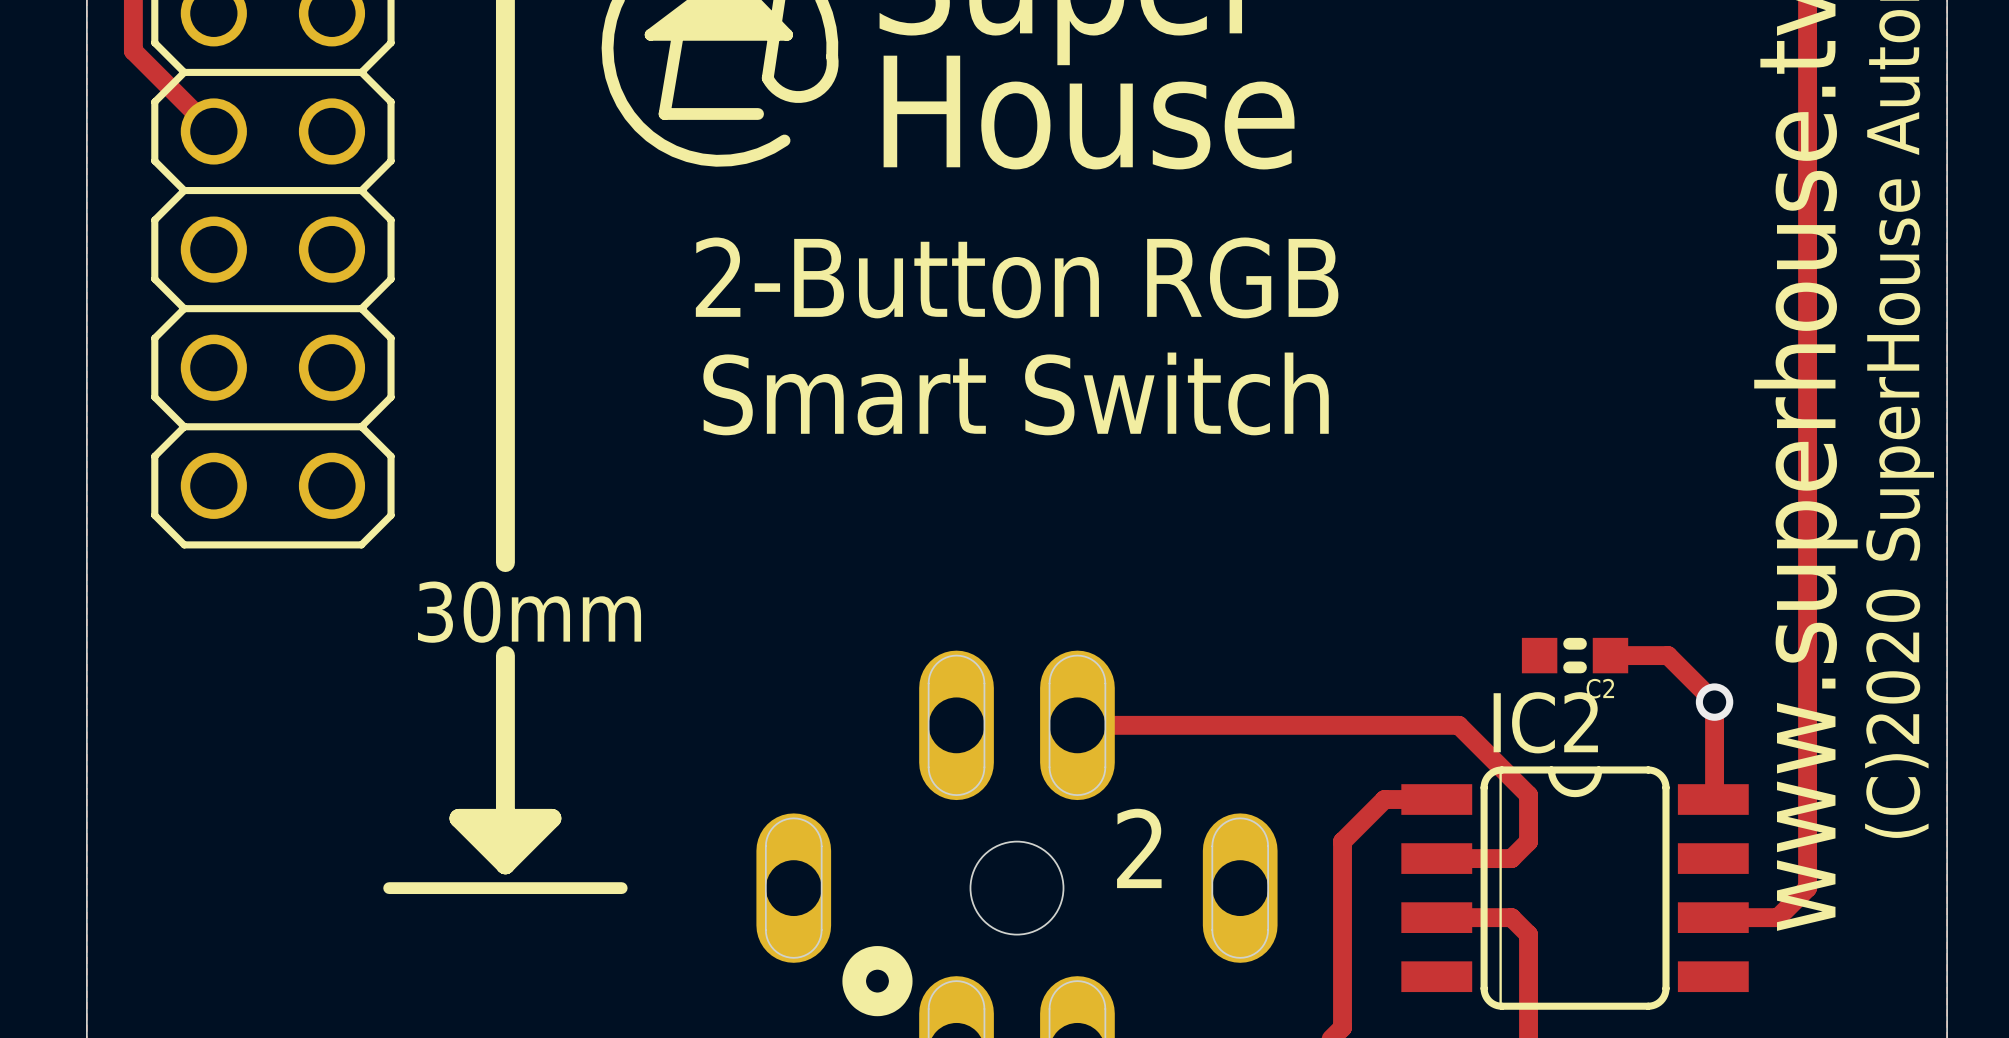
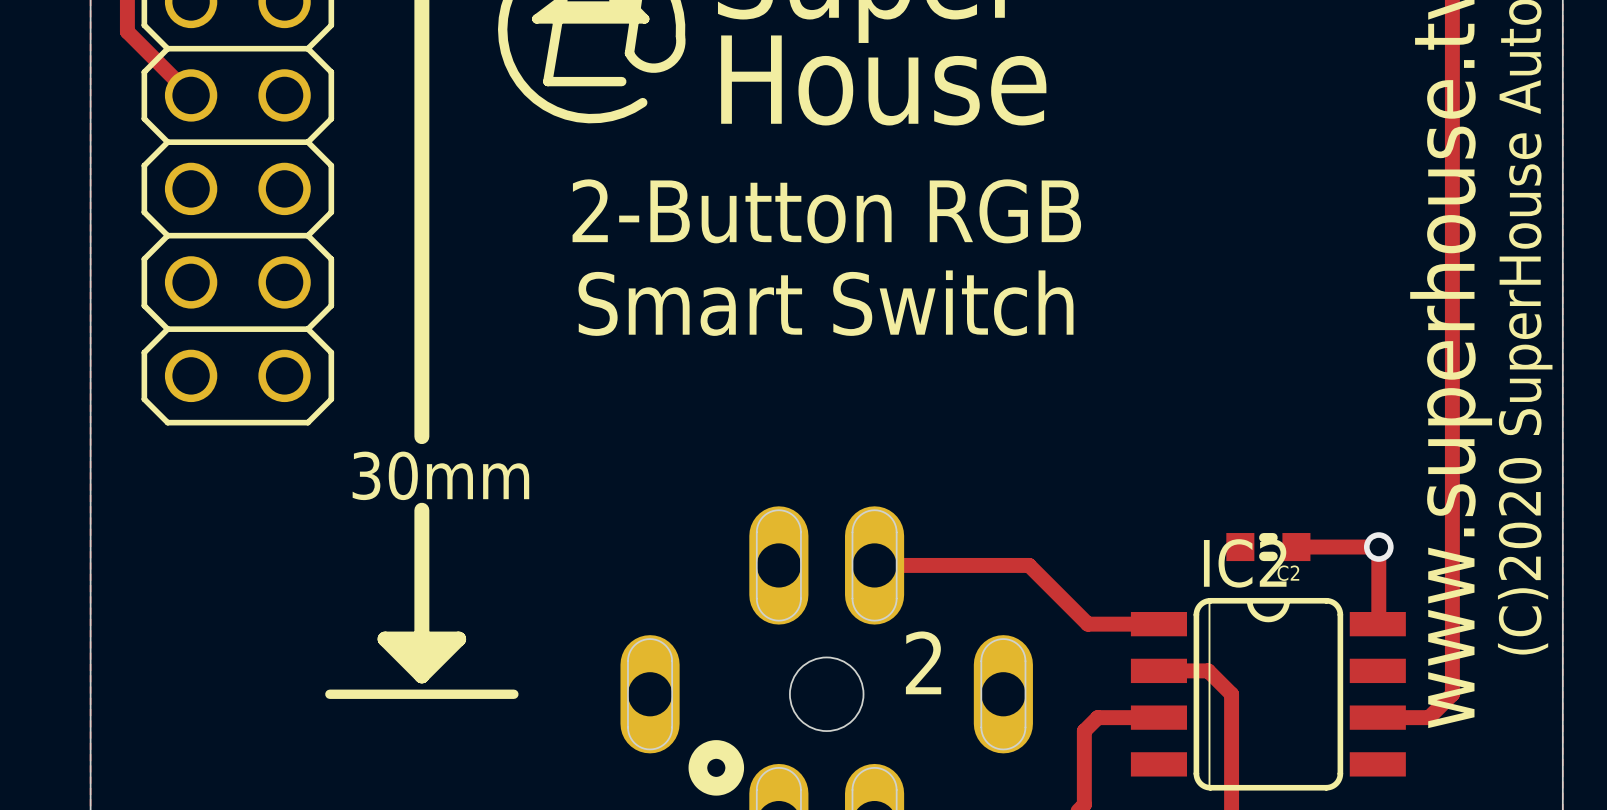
C2 position: (1575, 655) -> (1268, 547)
track: (1610, 655) (1668, 655) (1714, 702) -> (1296, 547) (1378, 547)
track: (1272, 725) (1458, 725) (1528, 795) (1528, 841) (1511, 858) (1499, 858) -> (1029, 565) (1087, 624) (1117, 624)
track: (1384, 799) (1342, 841) (1342, 934) -> (1158, 717) (1097, 717) (1084, 731)
track: (1436, 917) (1511, 917) (1528, 934) -> (1208, 670) (1231, 694) (1231, 731)

